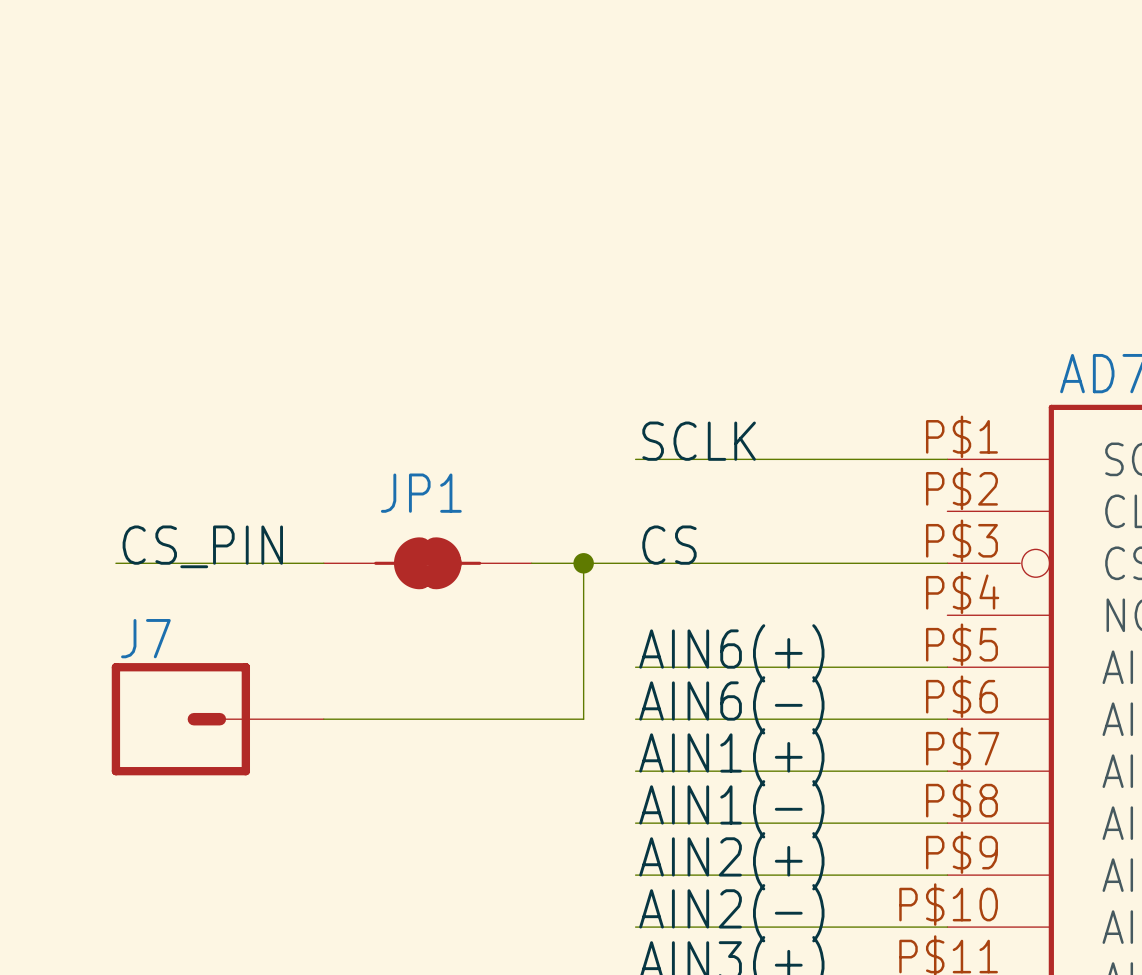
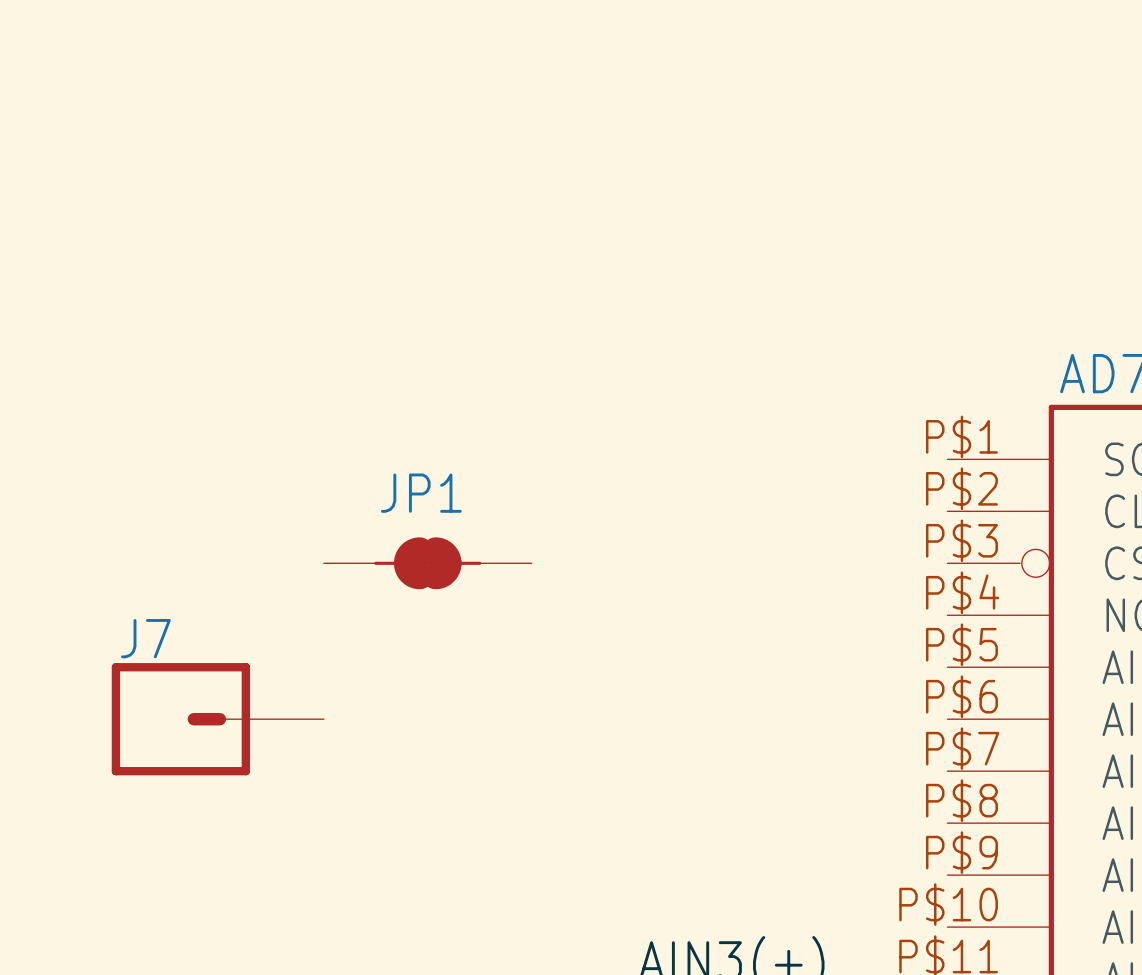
label: SCLK (699, 441) -> none
wire: (635, 459) (947, 459) -> none
label: CS (669, 545) -> none
label: CS_PIN (202, 546) -> none
wire: (115, 563) (323, 563) -> none
wire: (531, 563) (947, 563) -> none
wire: (583, 563) (583, 719) (323, 719) -> none
junction: (583, 563) -> none
label: AIN6(+) (731, 653) -> none
wire: (635, 667) (947, 667) -> none
label: AIN6(-) (731, 705) -> none
wire: (635, 719) (947, 719) -> none
label: AIN1(+) (731, 757) -> none
wire: (635, 771) (947, 771) -> none
label: AIN1(-) (731, 809) -> none
wire: (635, 823) (947, 823) -> none
label: AIN2(+) (731, 861) -> none
wire: (635, 875) (947, 875) -> none
label: AIN2(-) (731, 913) -> none
wire: (635, 927) (947, 927) -> none

